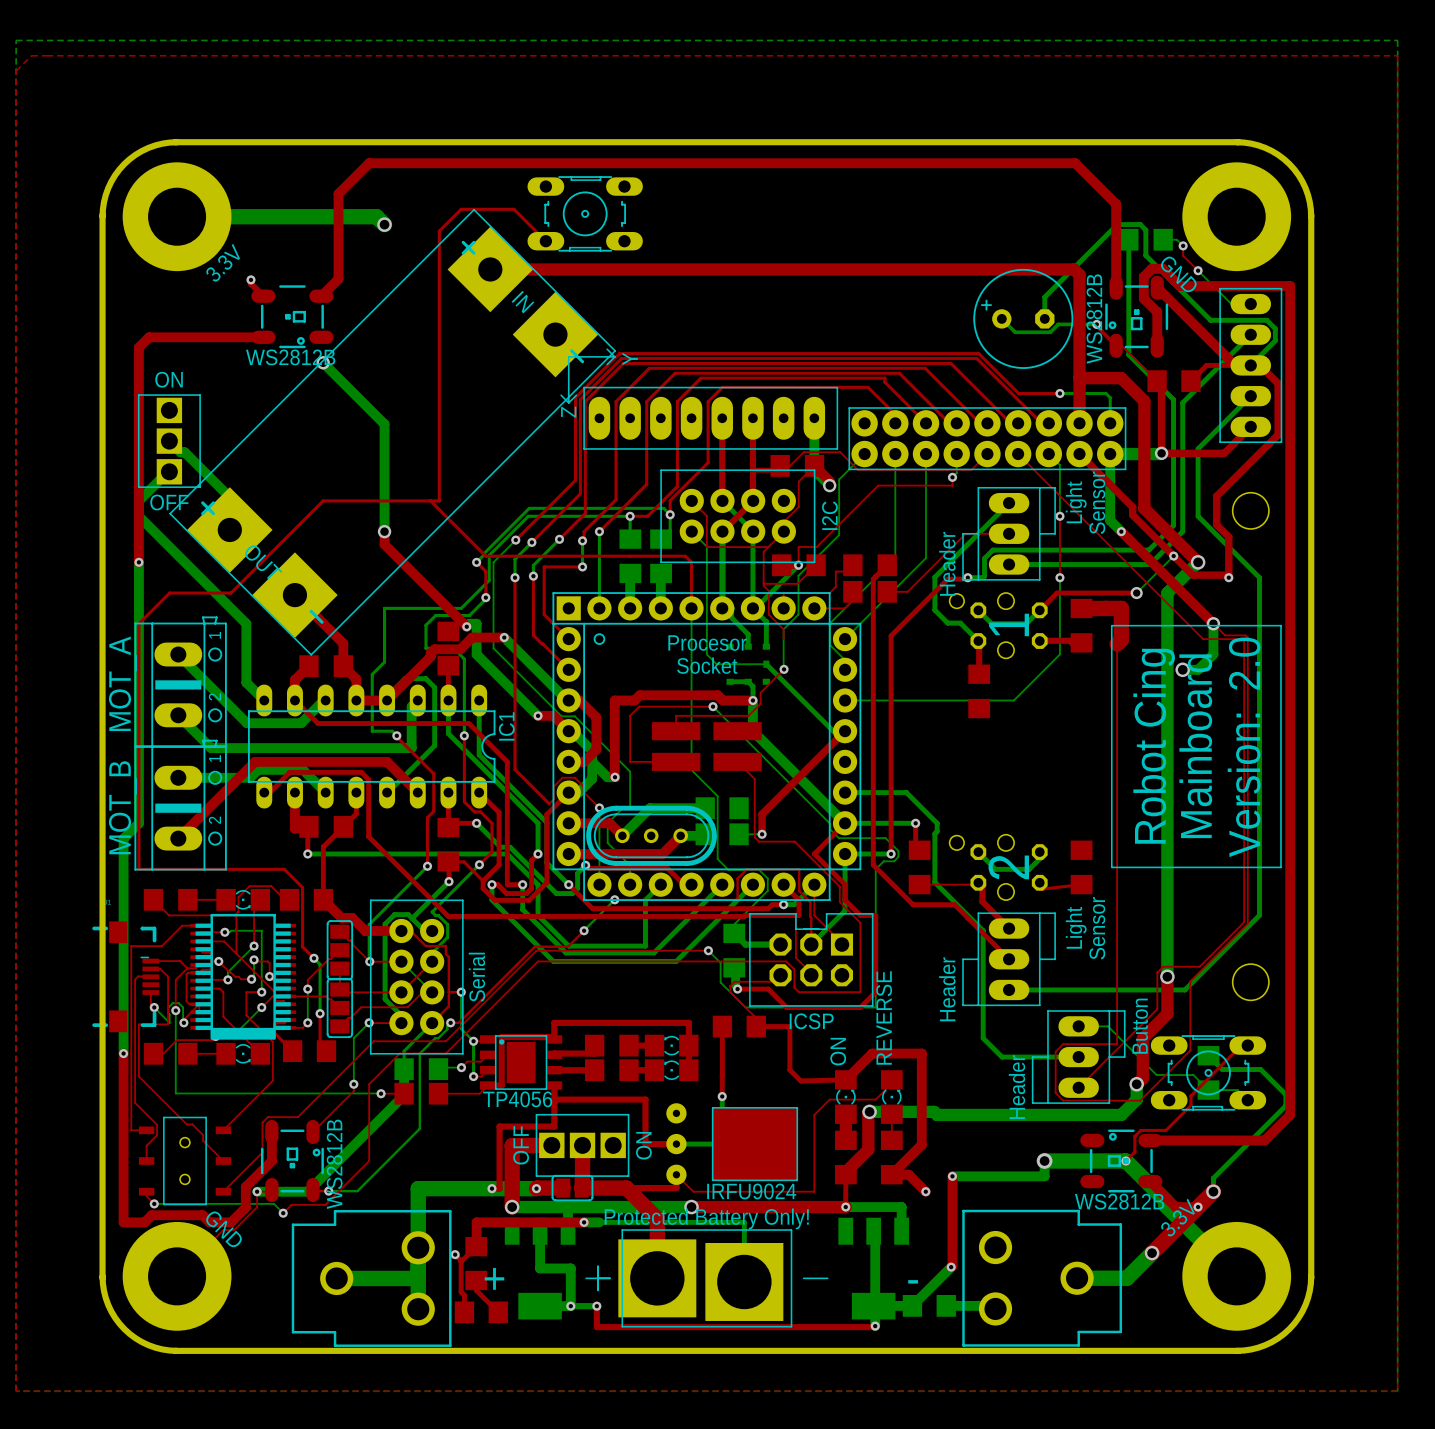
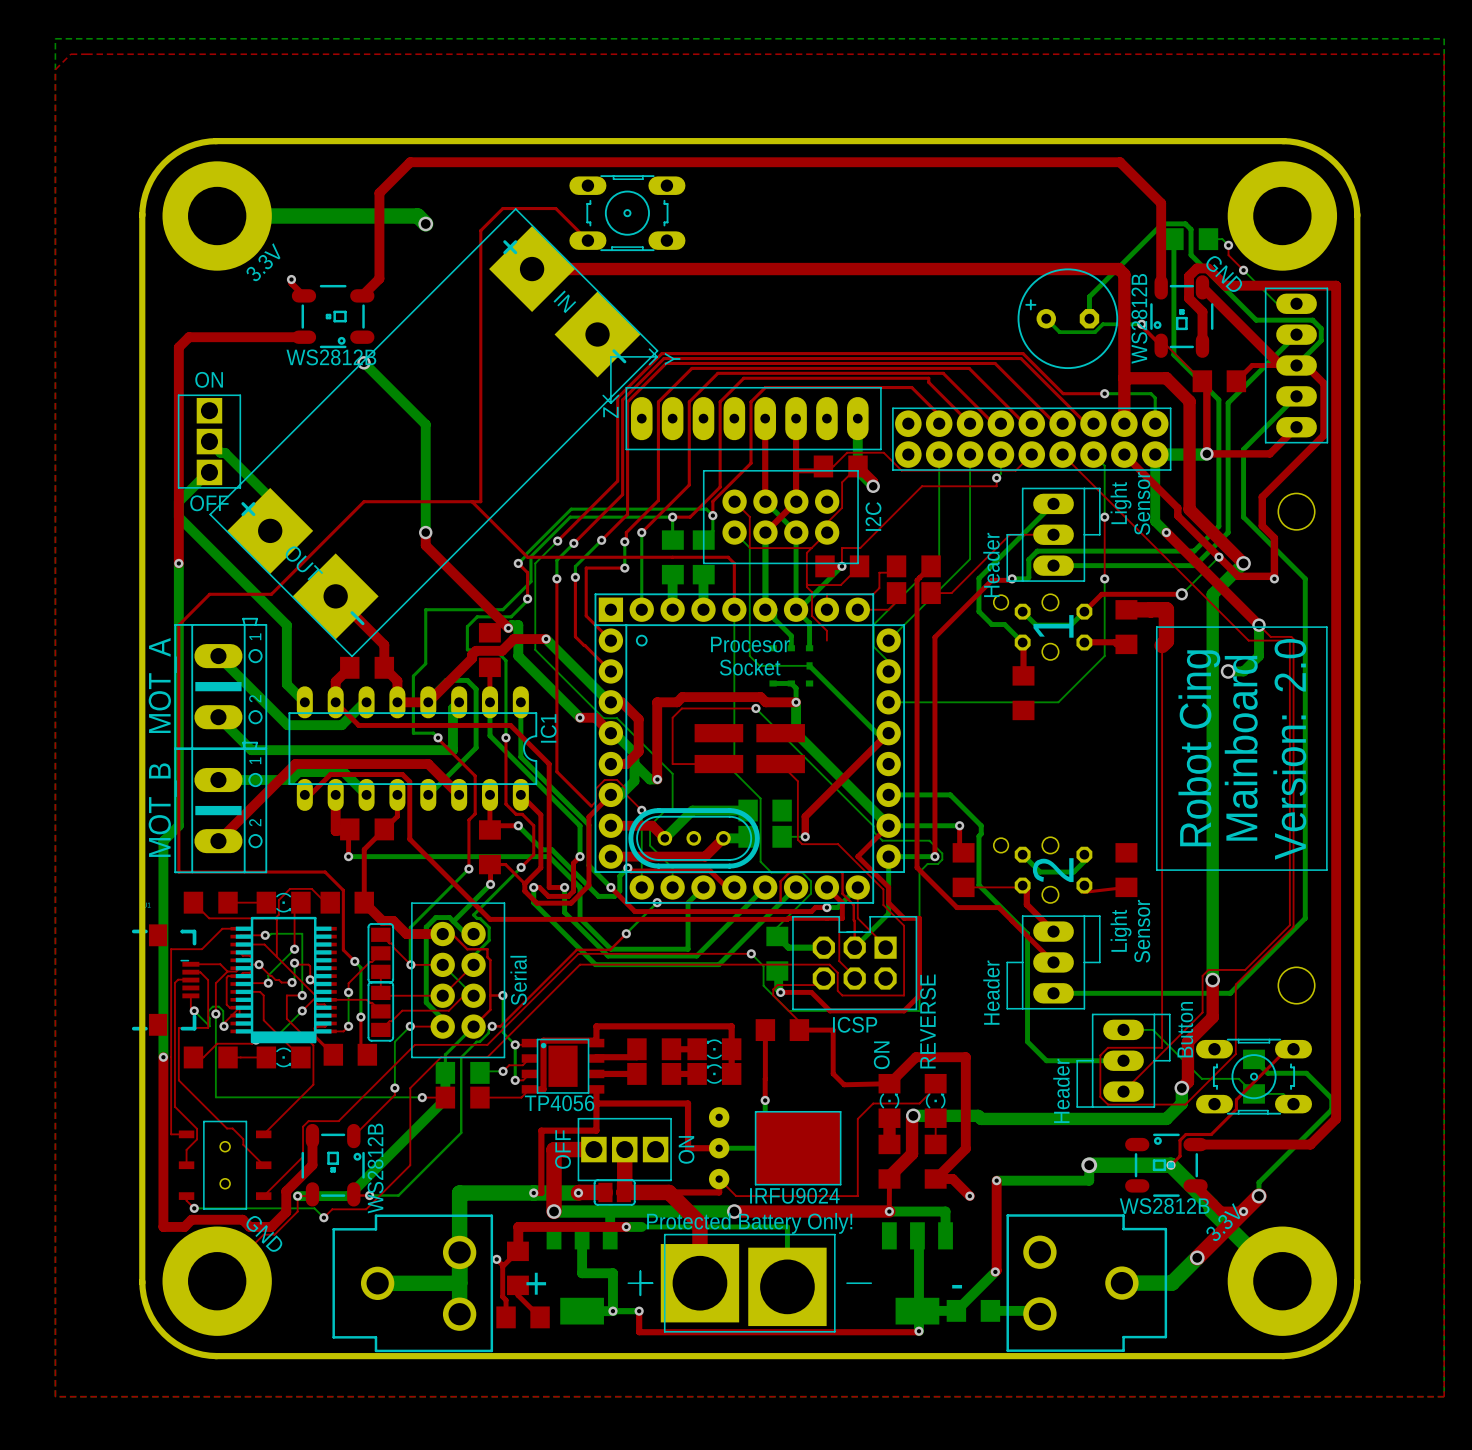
bottom track: (864, 454) (839, 479) (839, 535) (798, 575) (798, 614) (783, 629) (784, 669) -> none
top track: (784, 669) (760, 692) (760, 703) (748, 715) (676, 715) (676, 731) -> none
via: (784, 669) -> none

